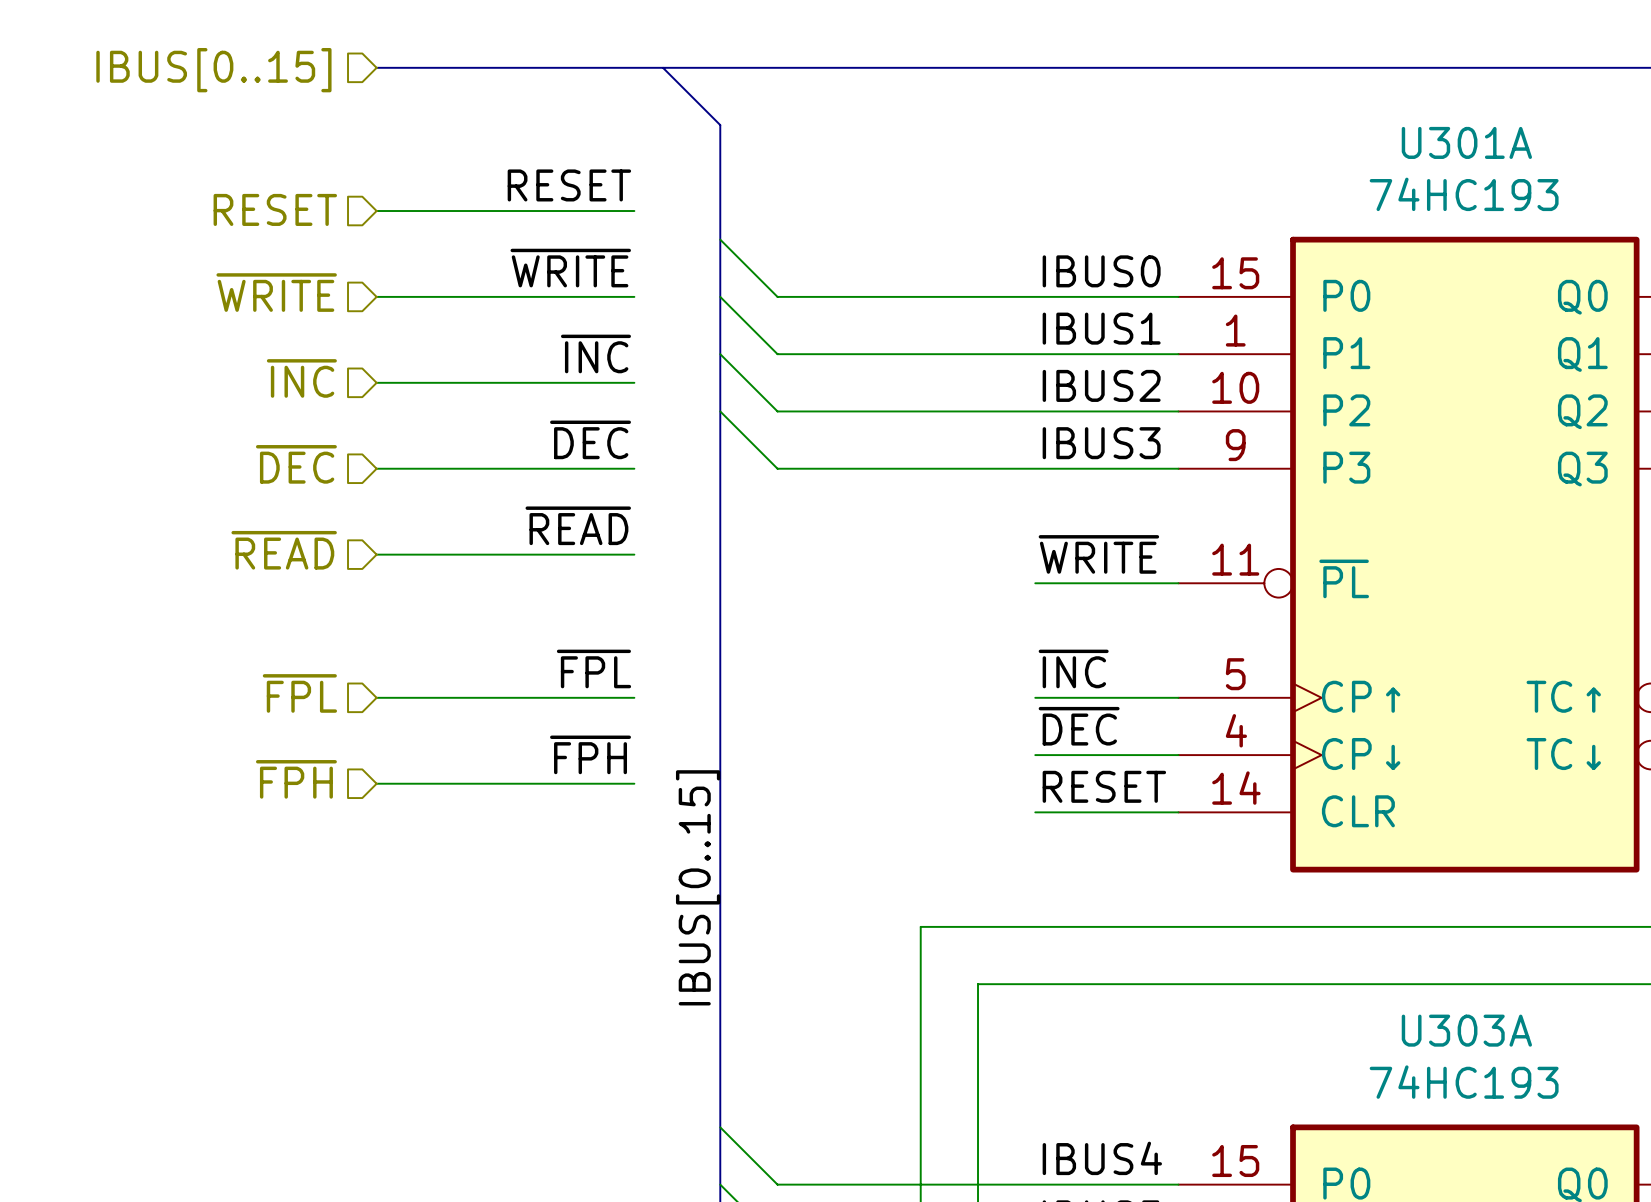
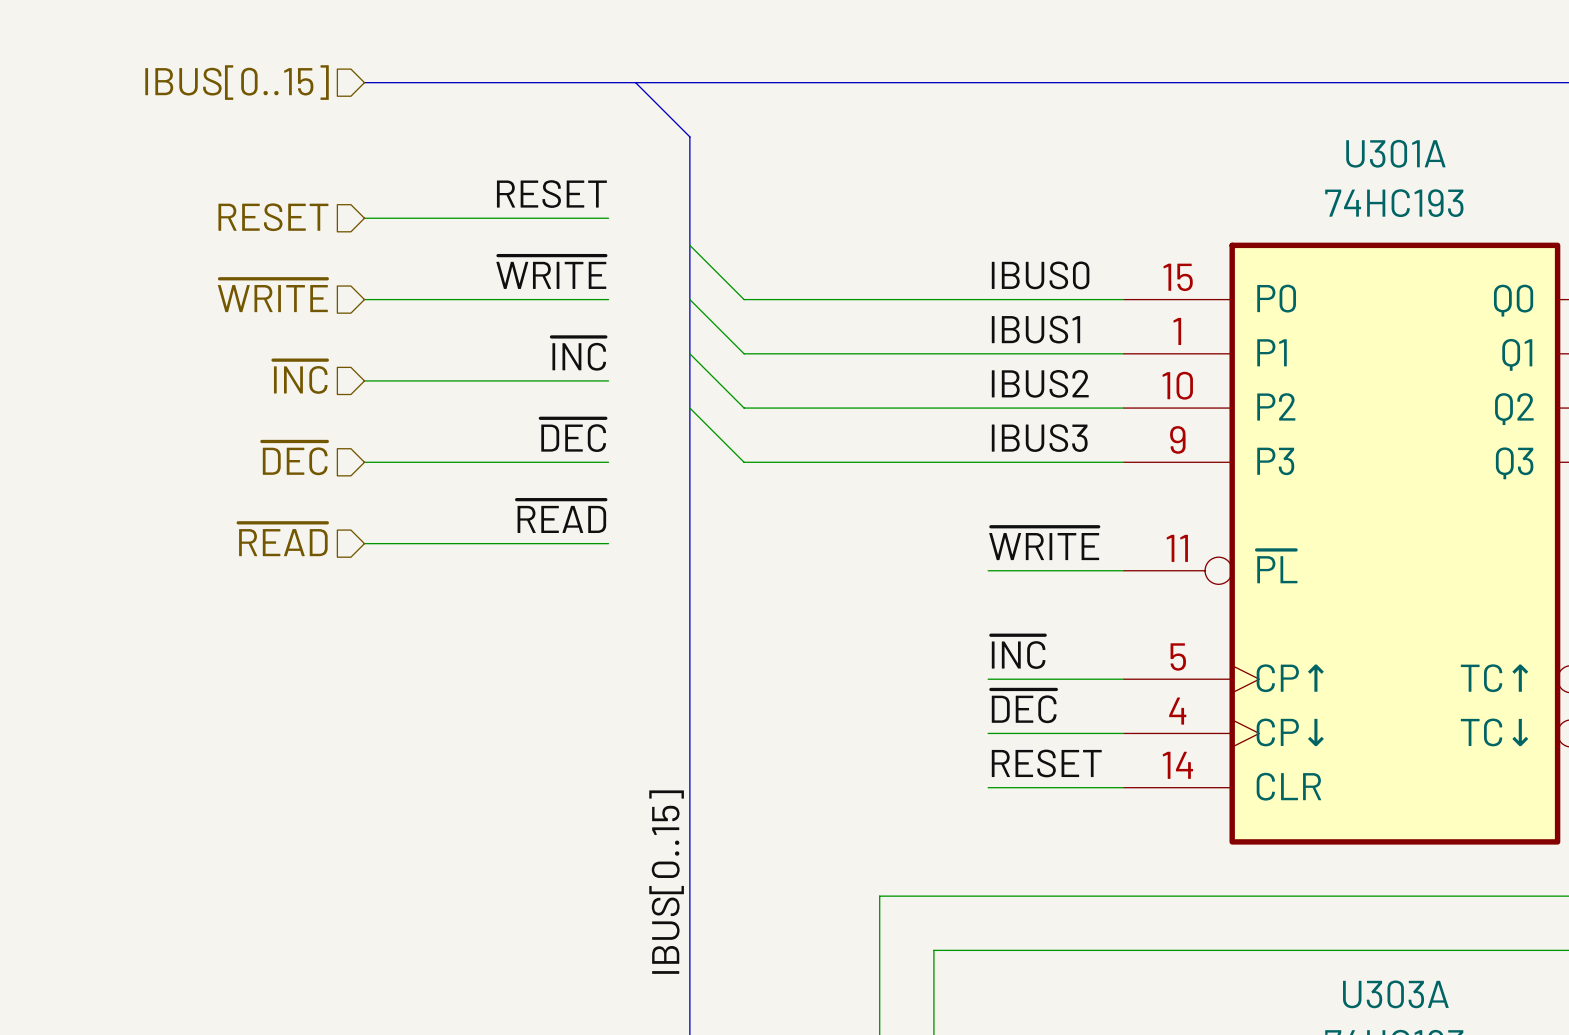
label: ~{FPL} (593, 668) -> none
hierarchical label: ~{FPL} (299, 693) -> none
wire: (376, 697) (634, 697) -> none
label: ~{FPH} (590, 754) -> none
hierarchical label: ~{FPH} (296, 779) -> none
wire: (376, 783) (634, 783) -> none

